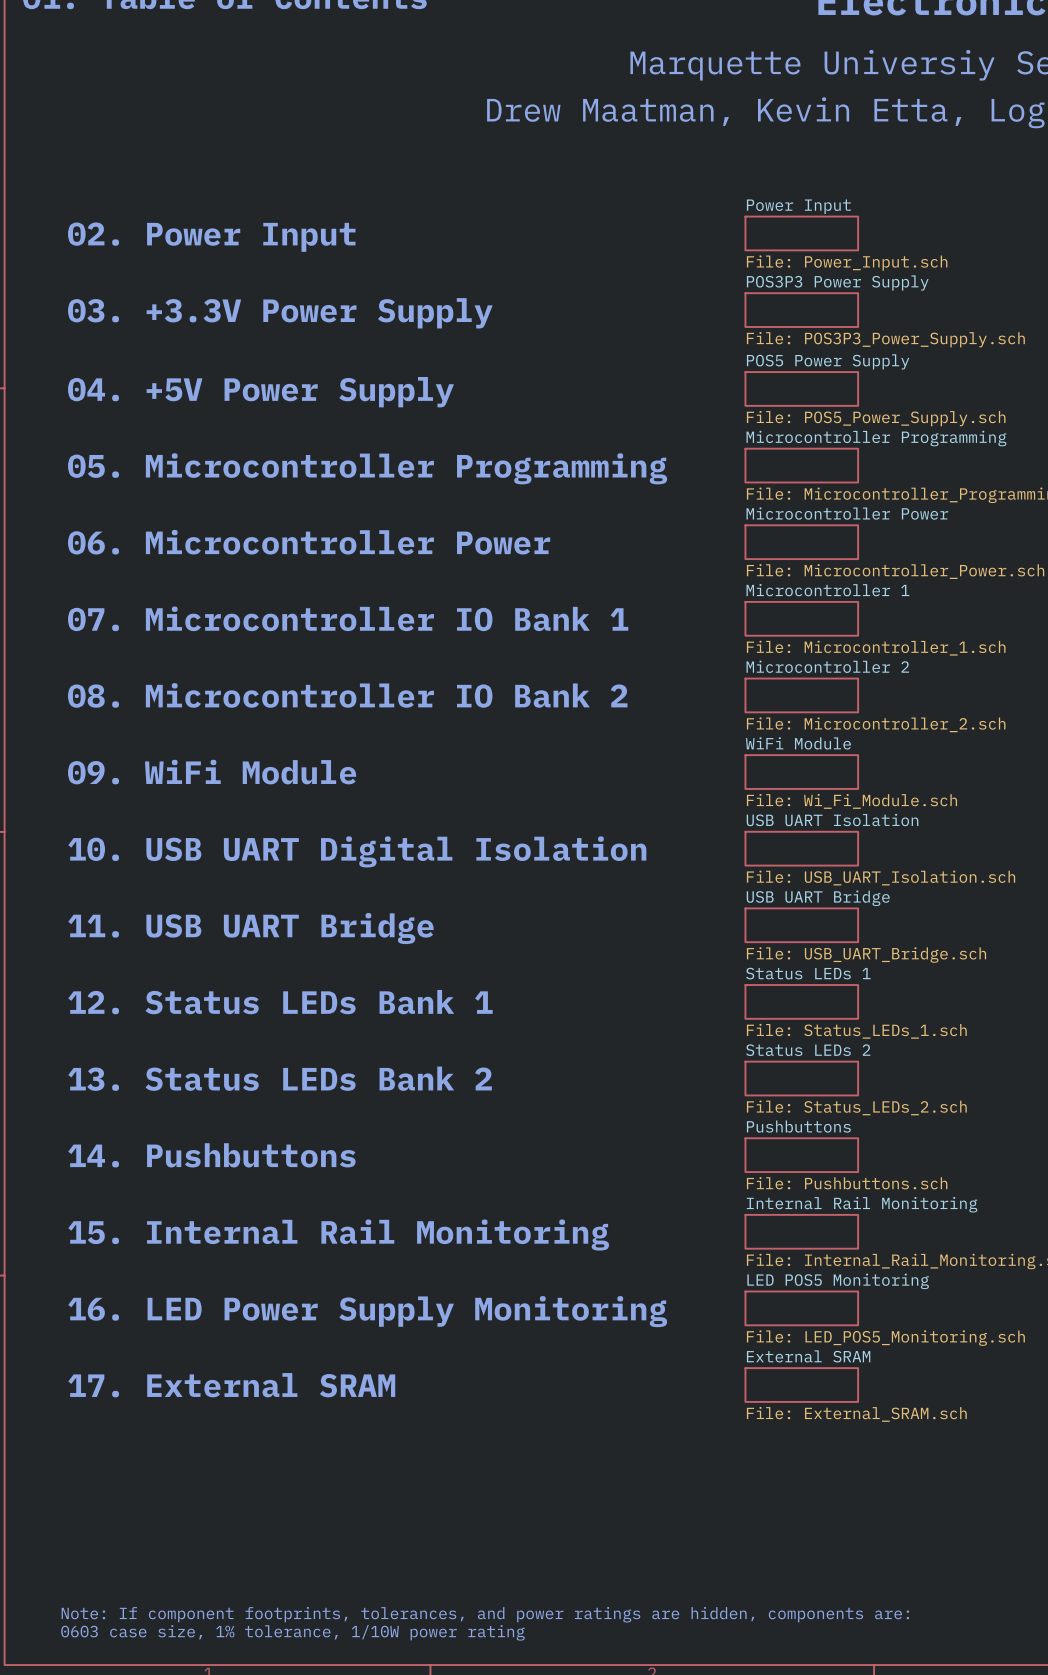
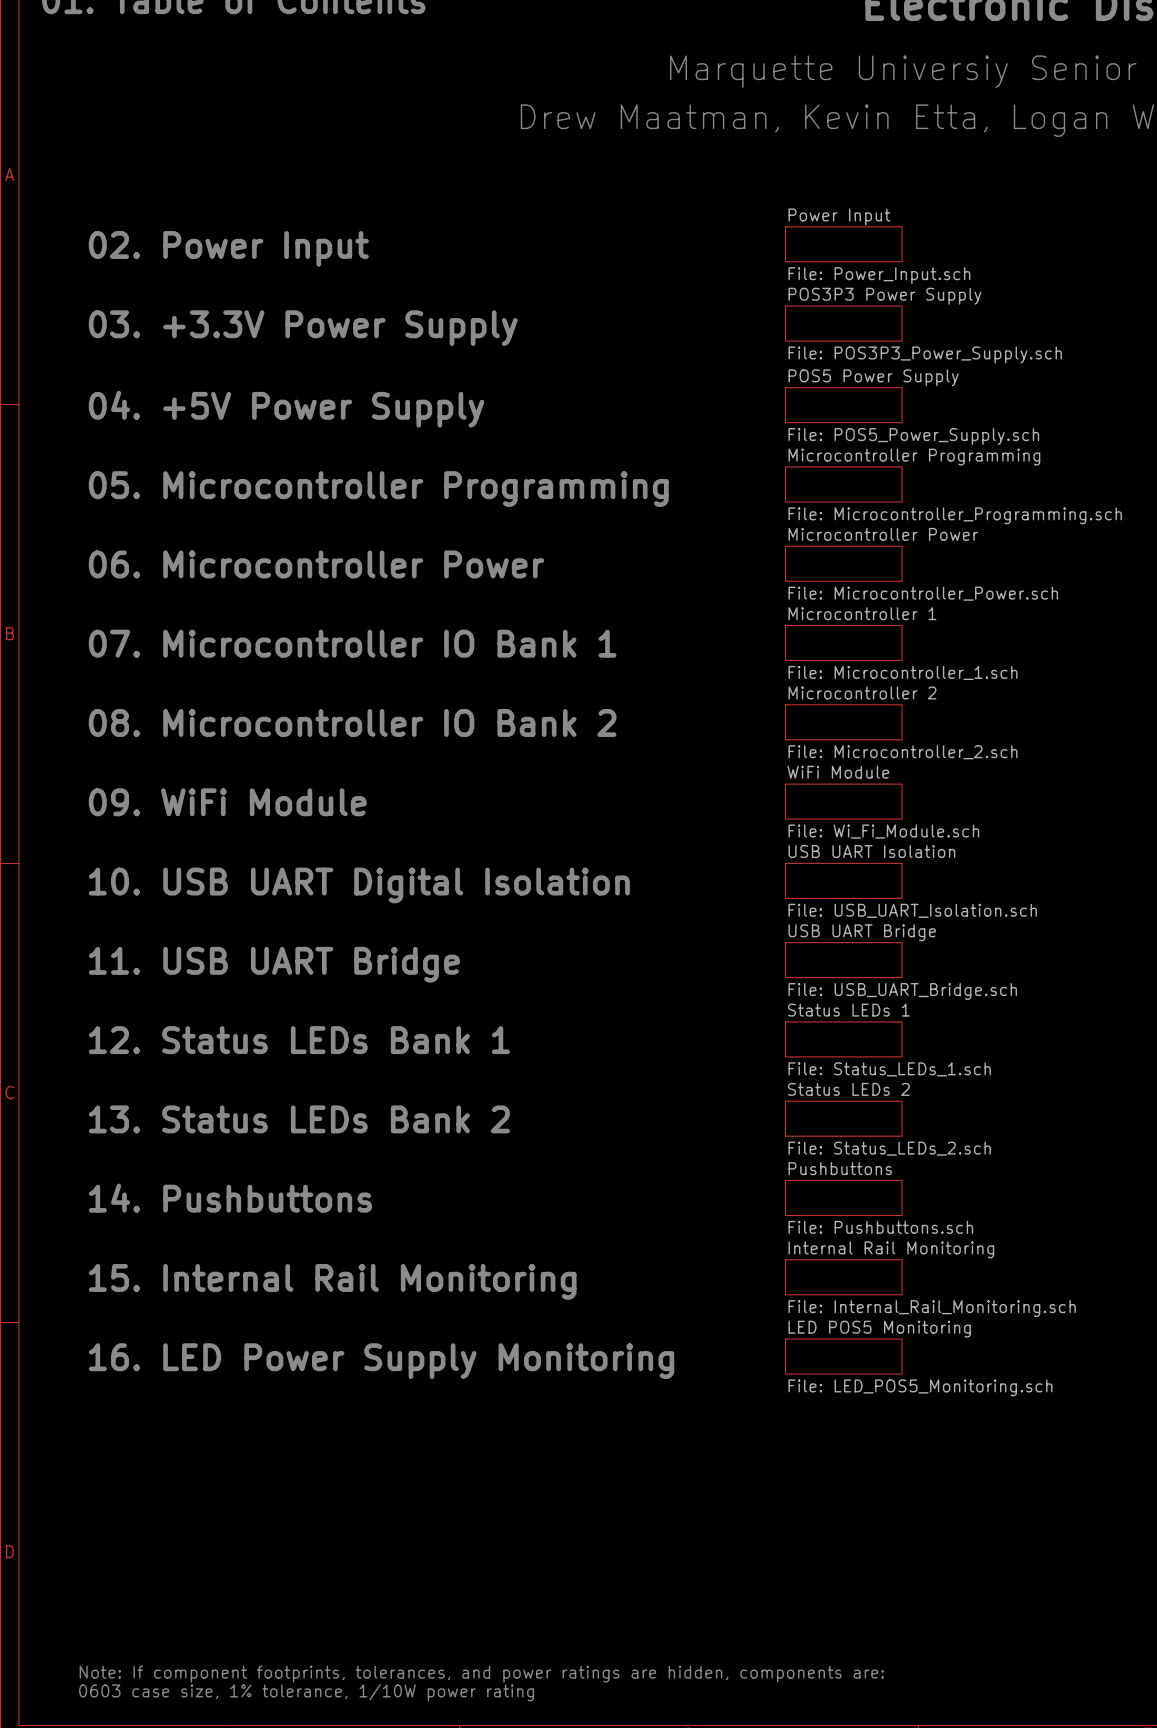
text: 17. External SRAM (231, 1385) -> none
sheet External SRAM: File: External_SRAM.sch (801, 1385) -> none

